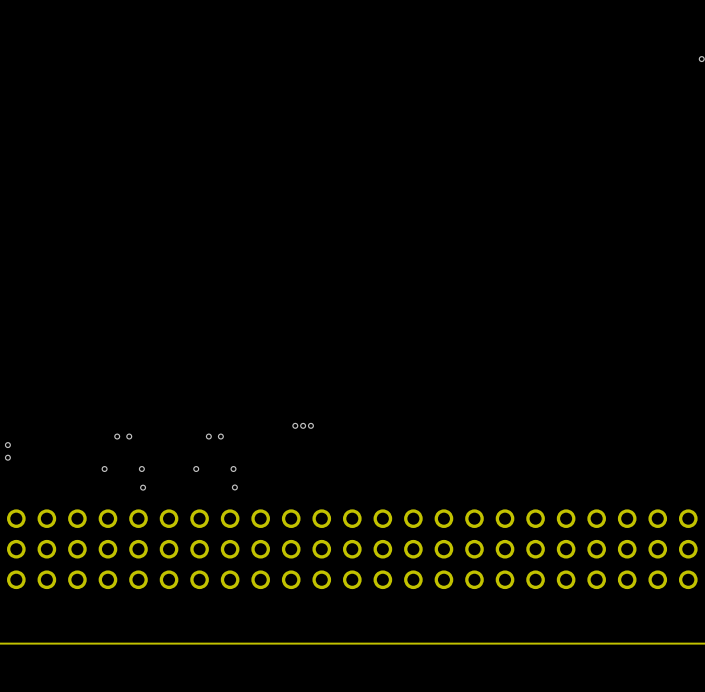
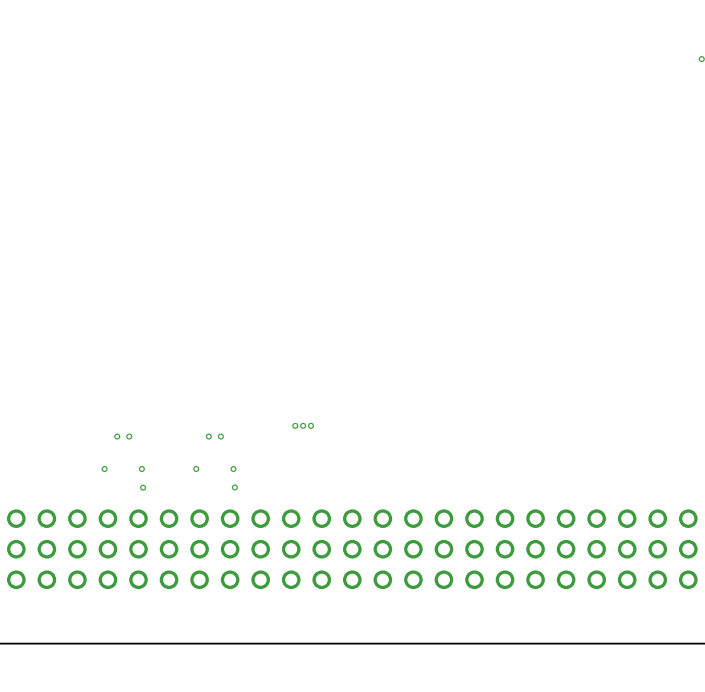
via: (7, 445) -> none
via: (7, 457) -> none

